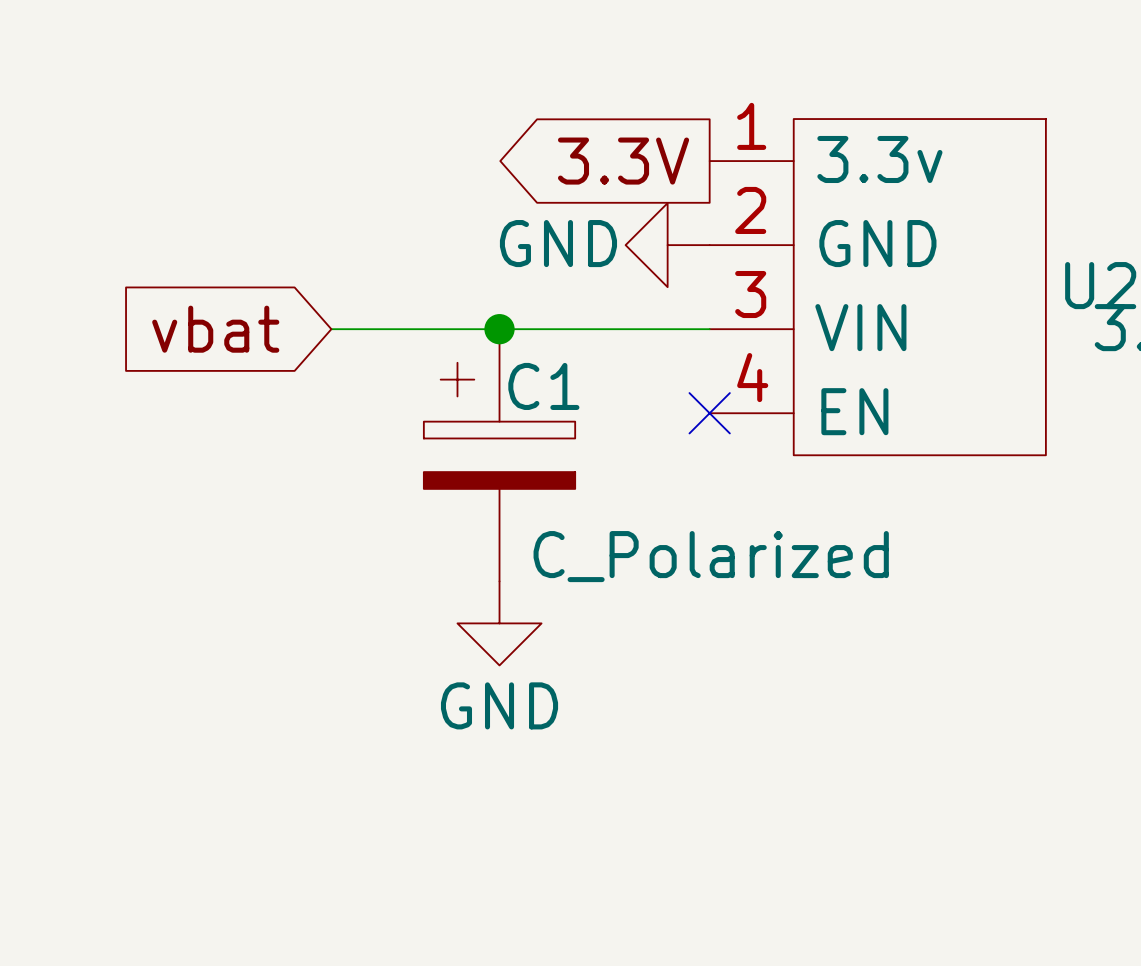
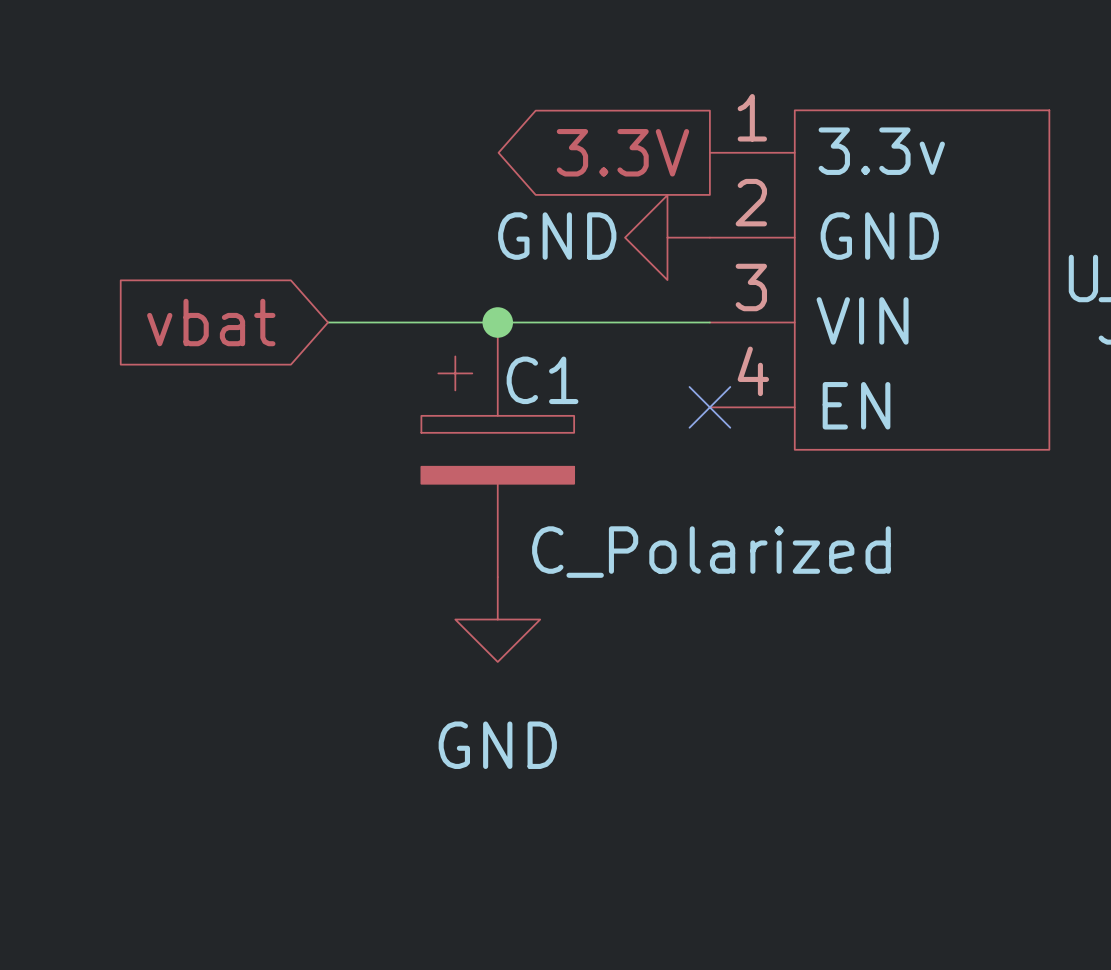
power symbol text position: GND (499, 705) -> GND (497, 745)

